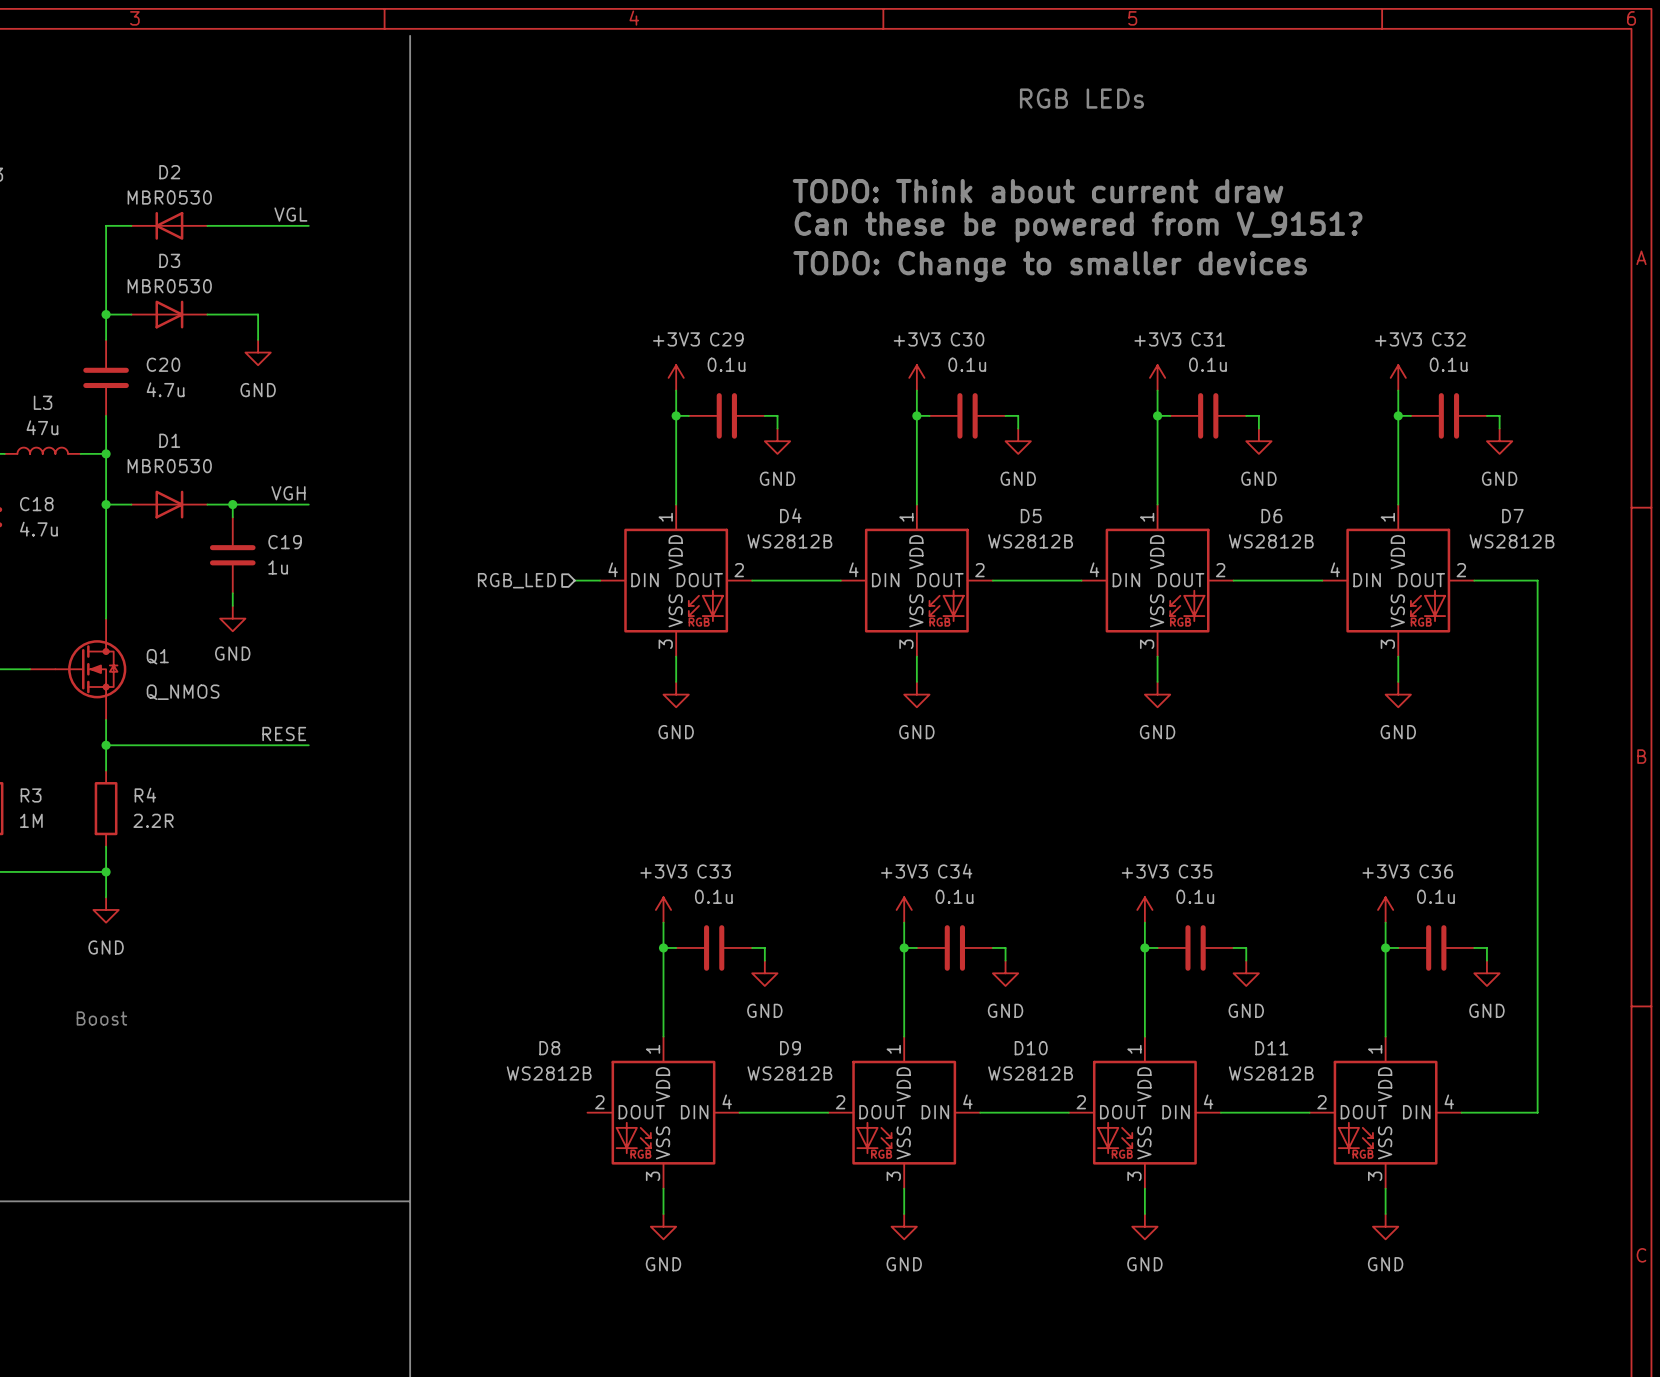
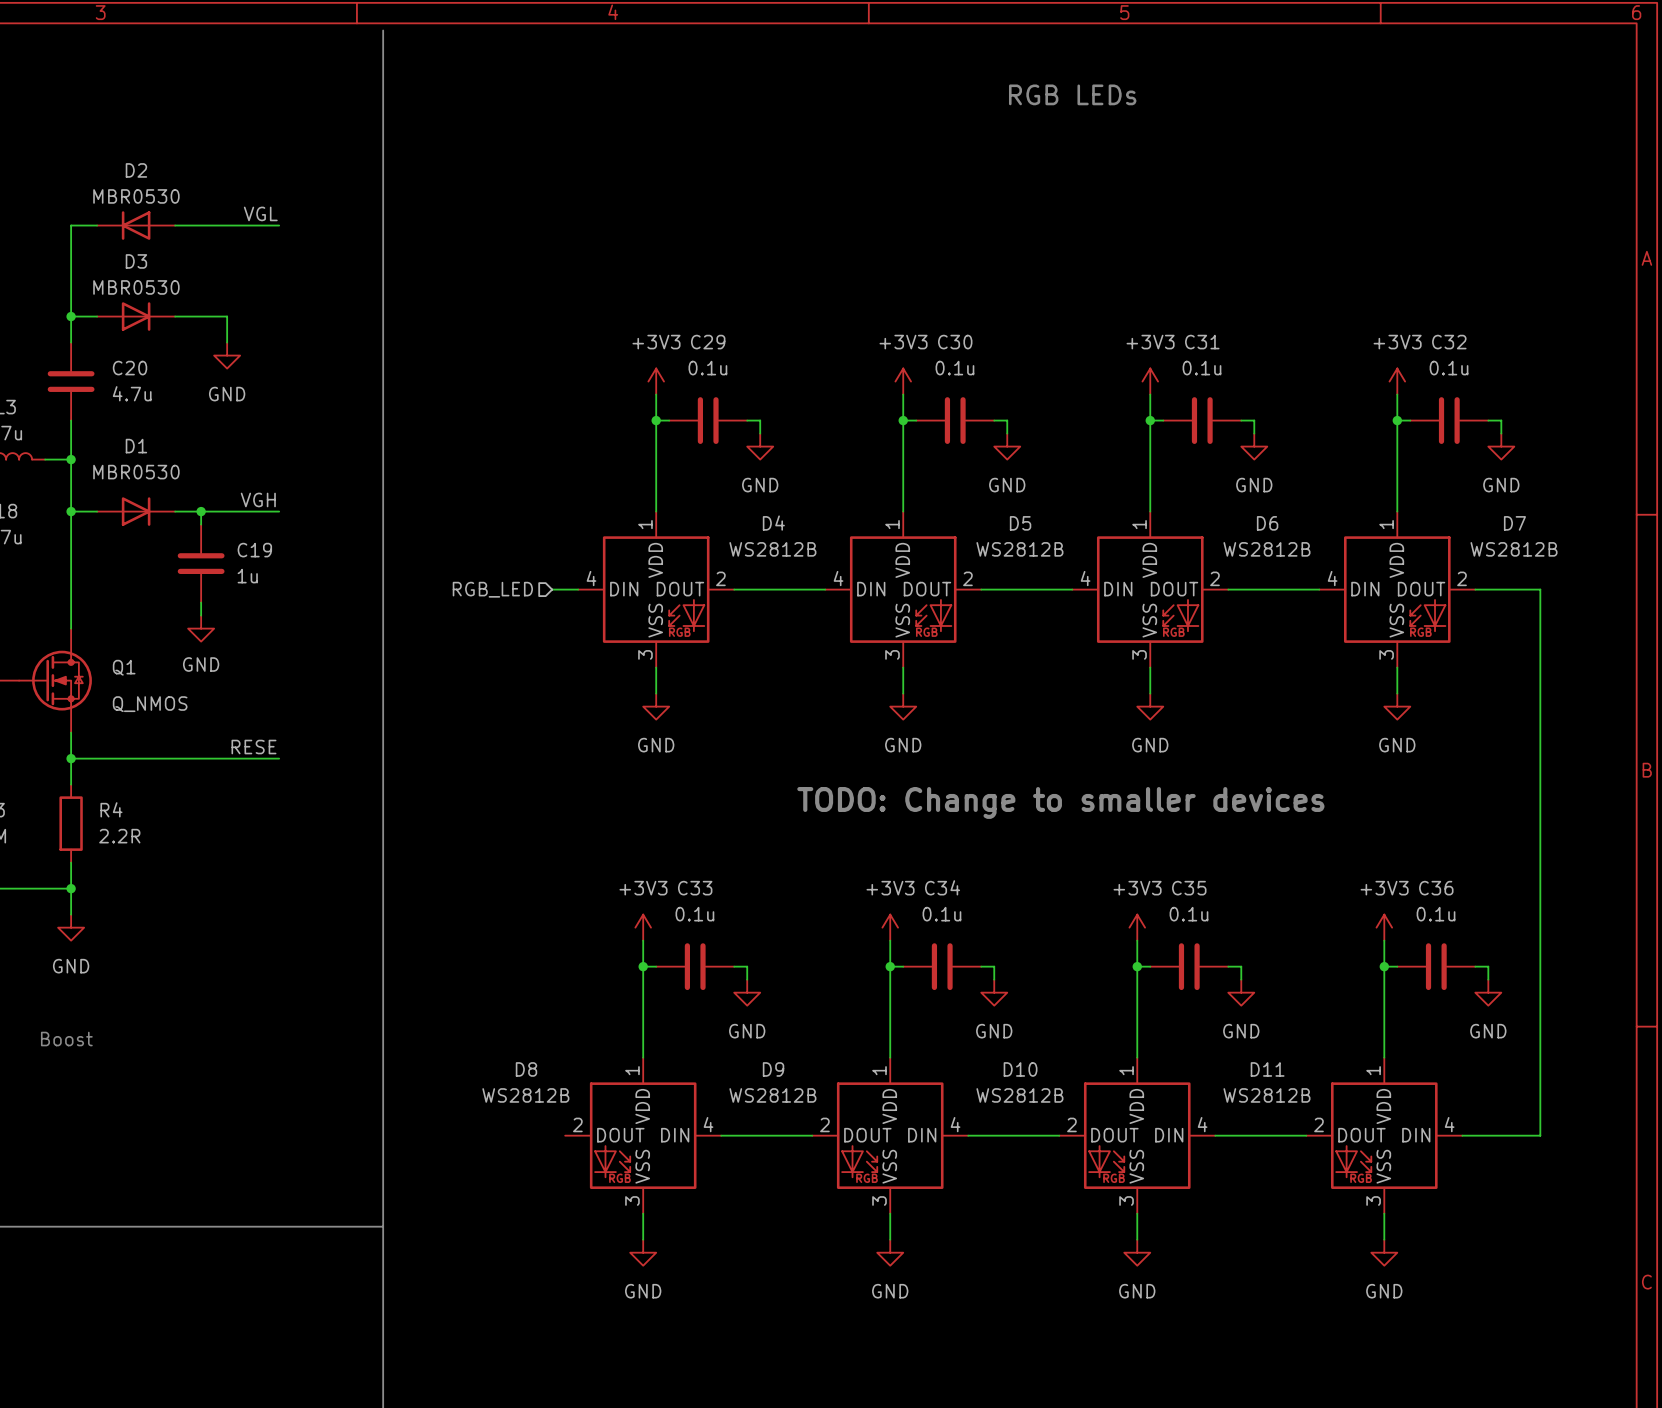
text: TODO: Think about current draw (1038, 191) -> none
text: Can these be powered from V_9151? (1078, 227) -> none
text: TODO: Change to smaller devices (1050, 266) -> none
text: none -> TODO: Change to smaller devices (1060, 802)

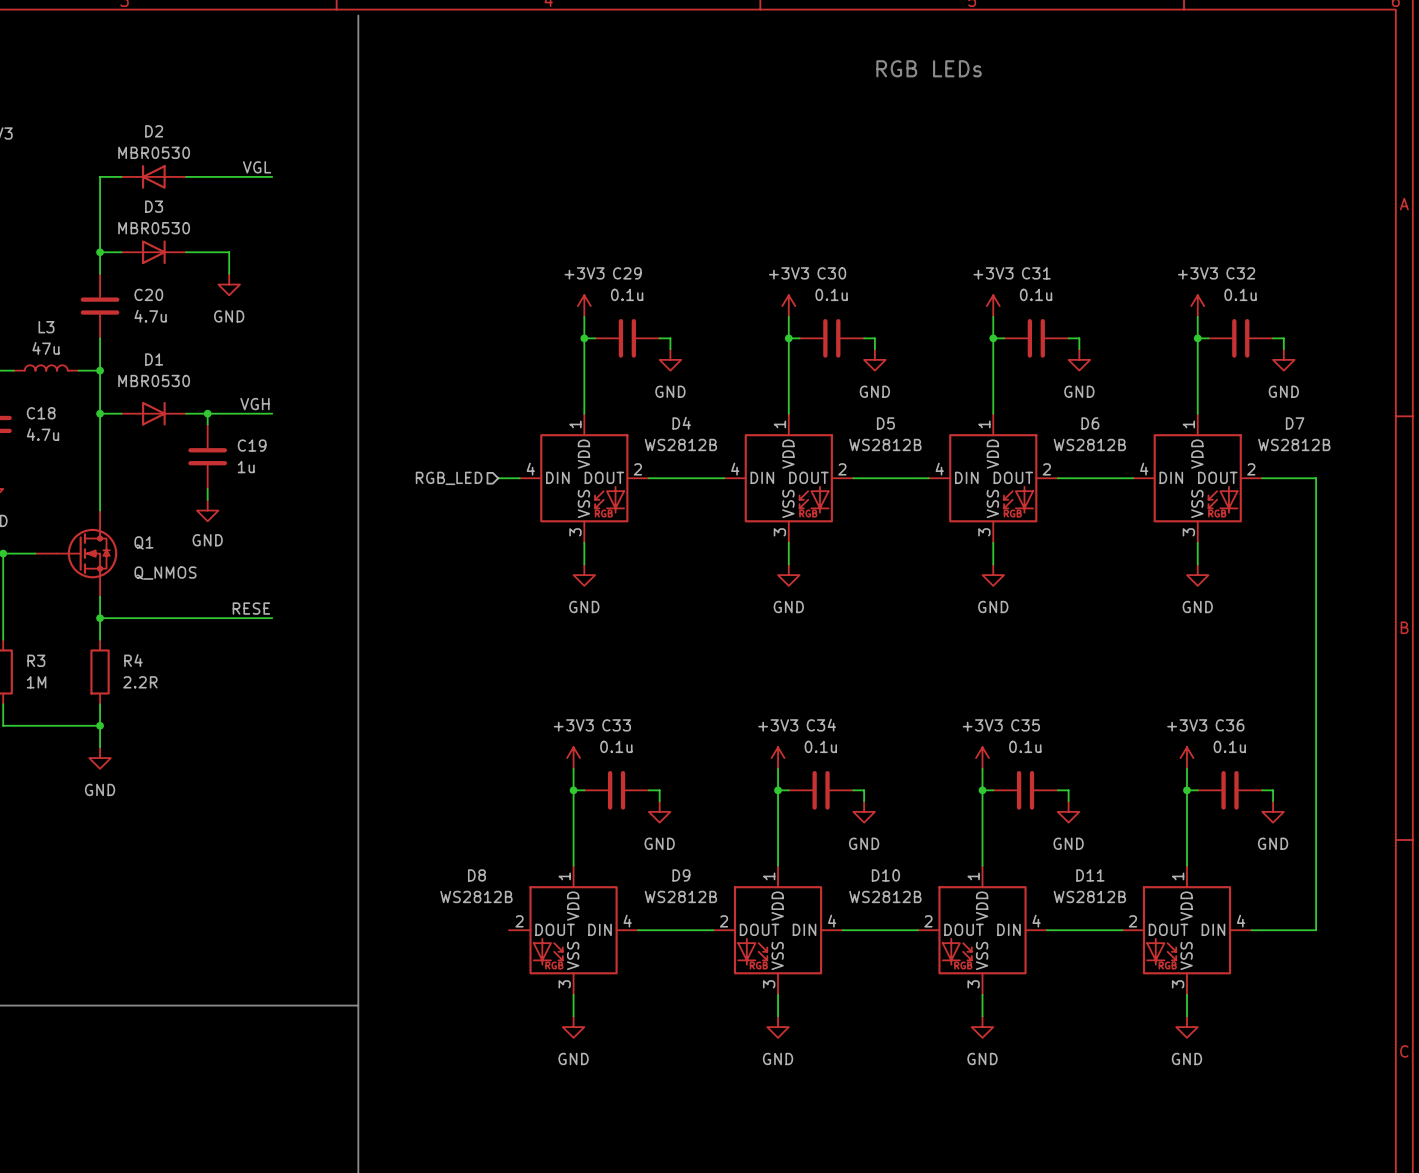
text: TODO: Change to smaller devices (1060, 802) -> none
text: Boost (66, 1039) -> none

